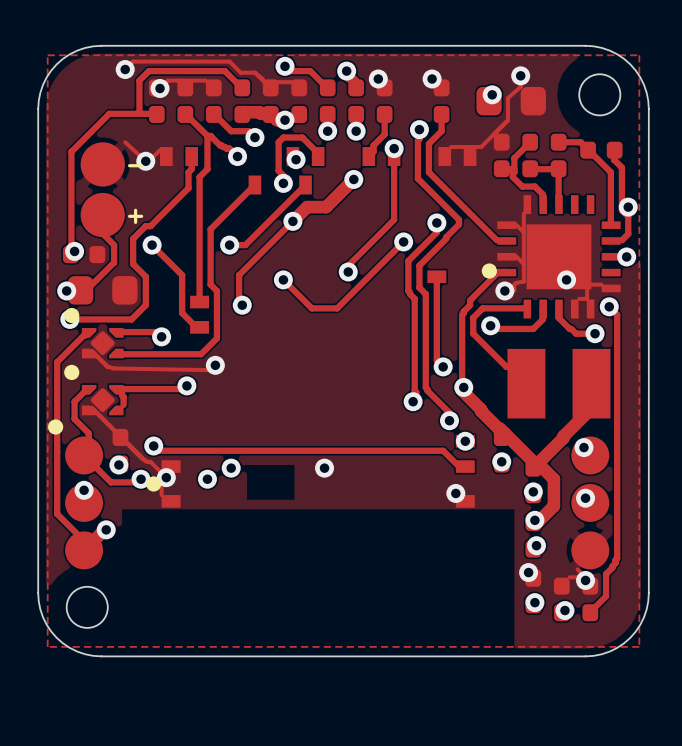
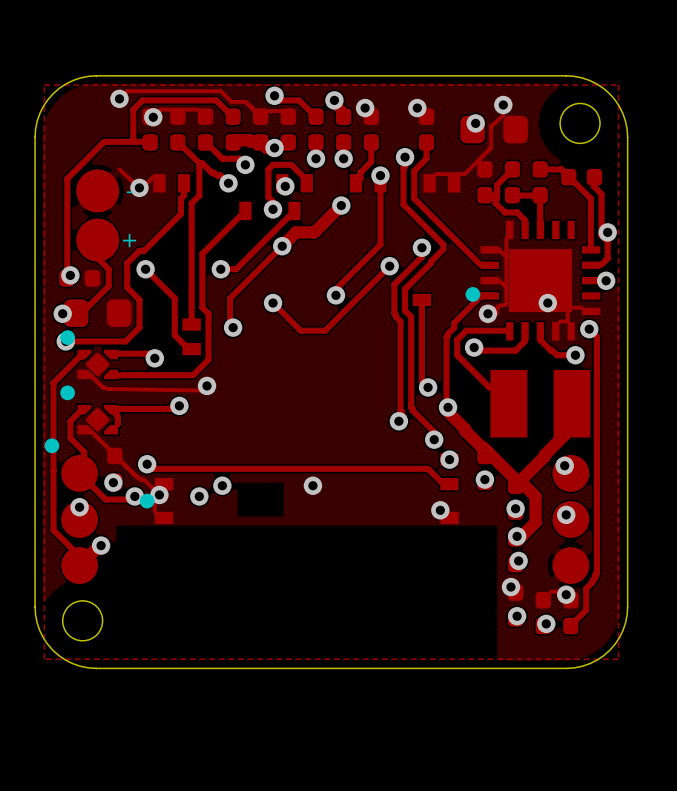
track: (577, 569) (582, 574) -> none

